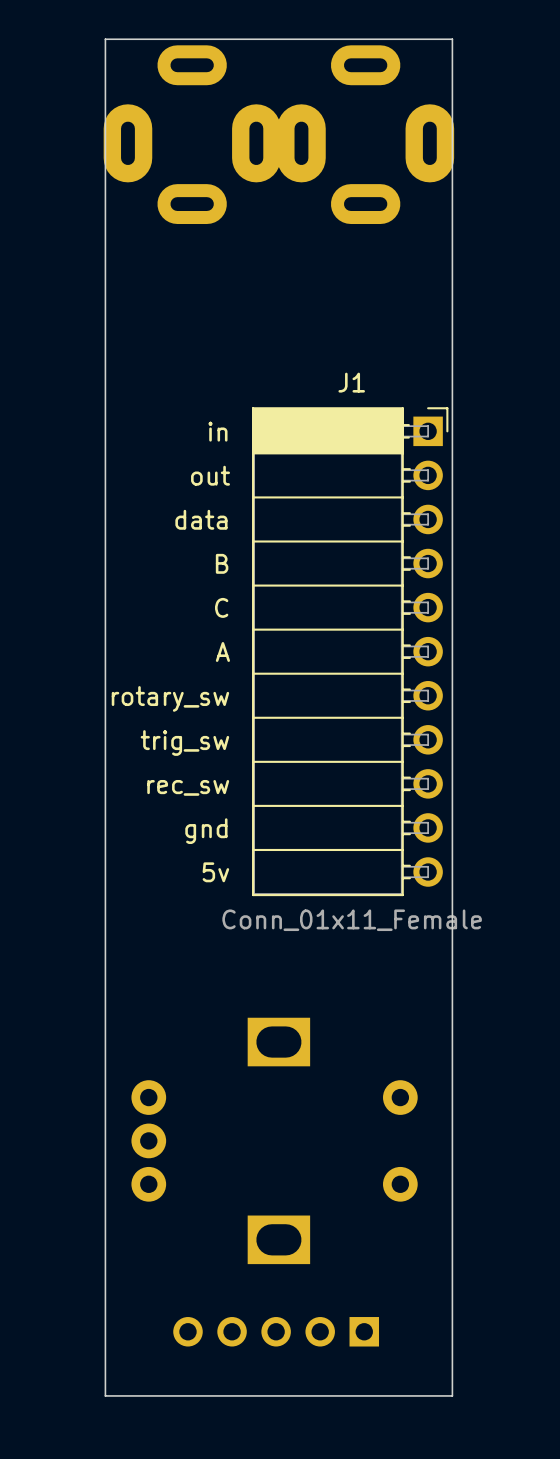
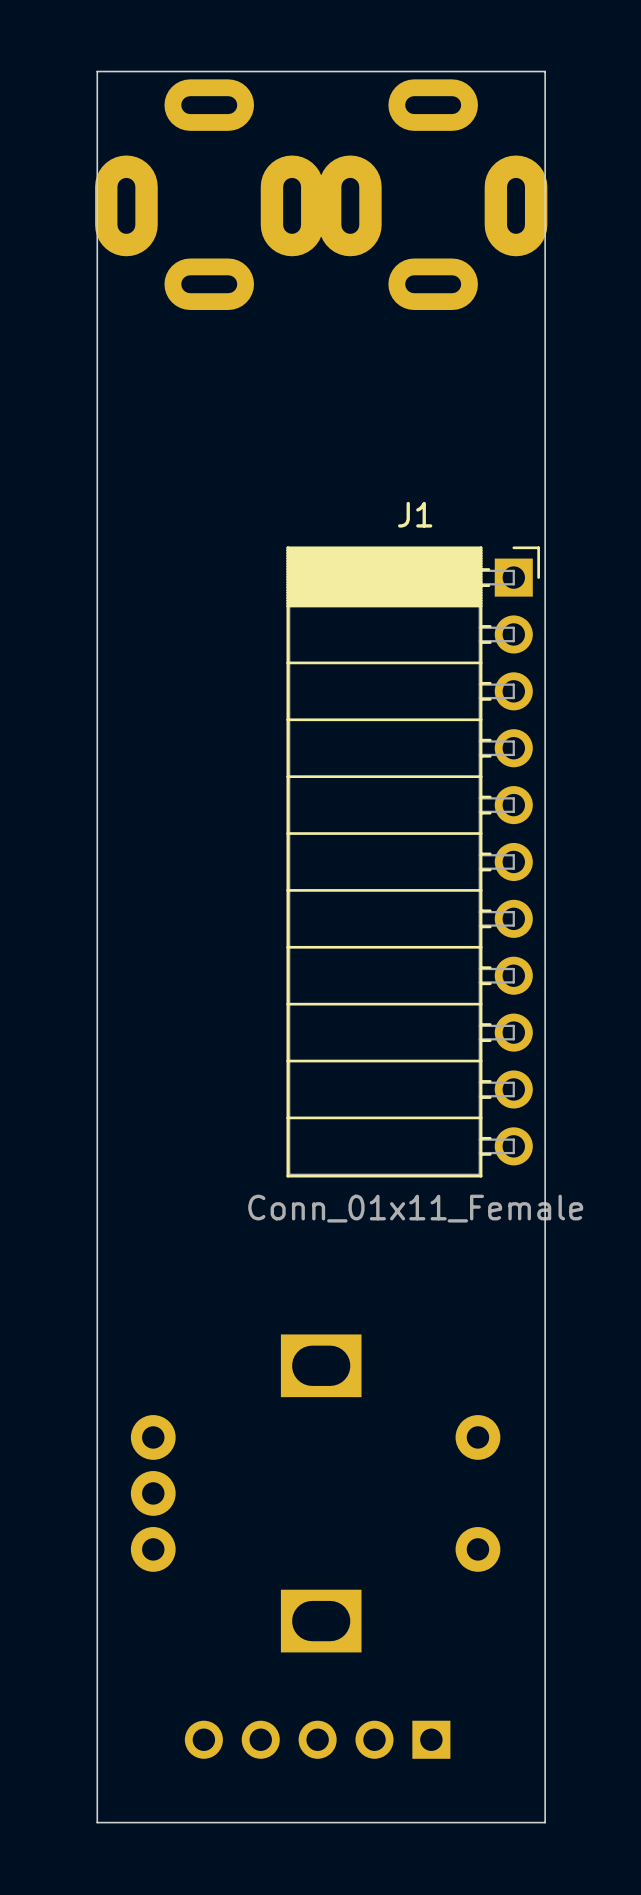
text: in (217, 431) -> none
text: out (210, 475) -> none
text: data (201, 519) -> none
text: B (222, 563) -> none
text: C (221, 607) -> none
text: A (222, 651) -> none
text: rotary_sw (170, 698) -> none
text: trig_sw (184, 743) -> none
text: rec_sw (188, 787) -> none
text: gnd (206, 831) -> none
text: 5v (215, 872) -> none

